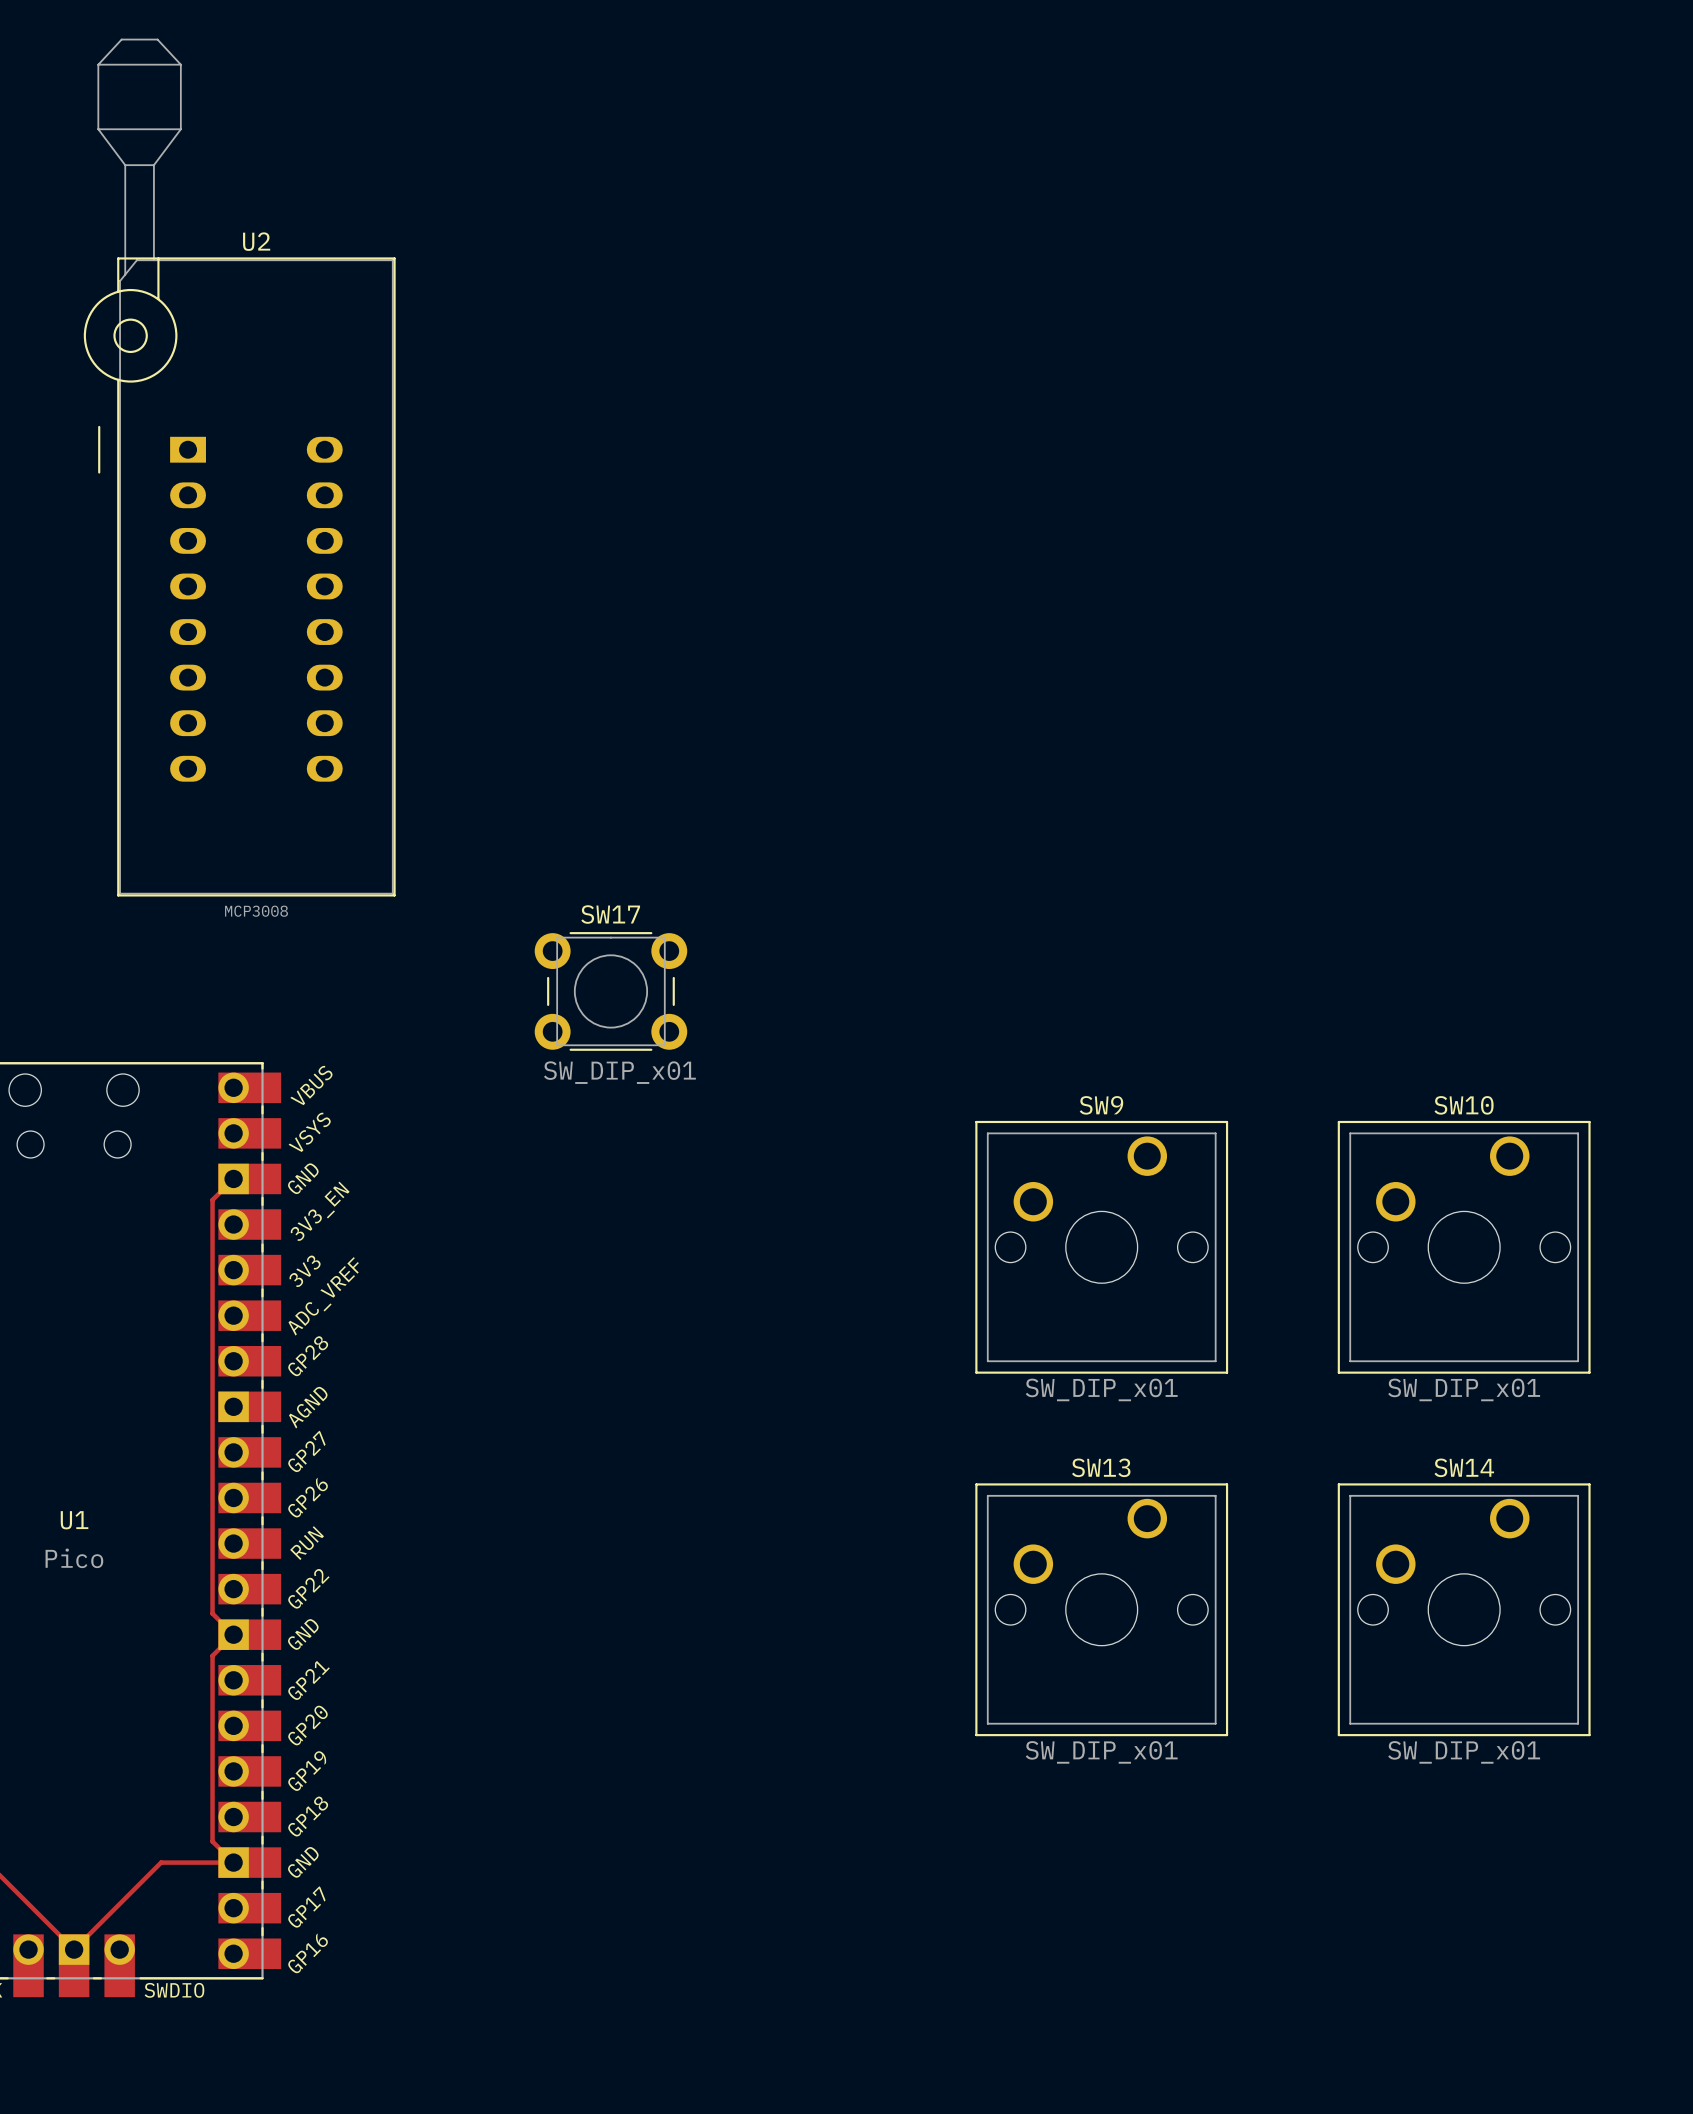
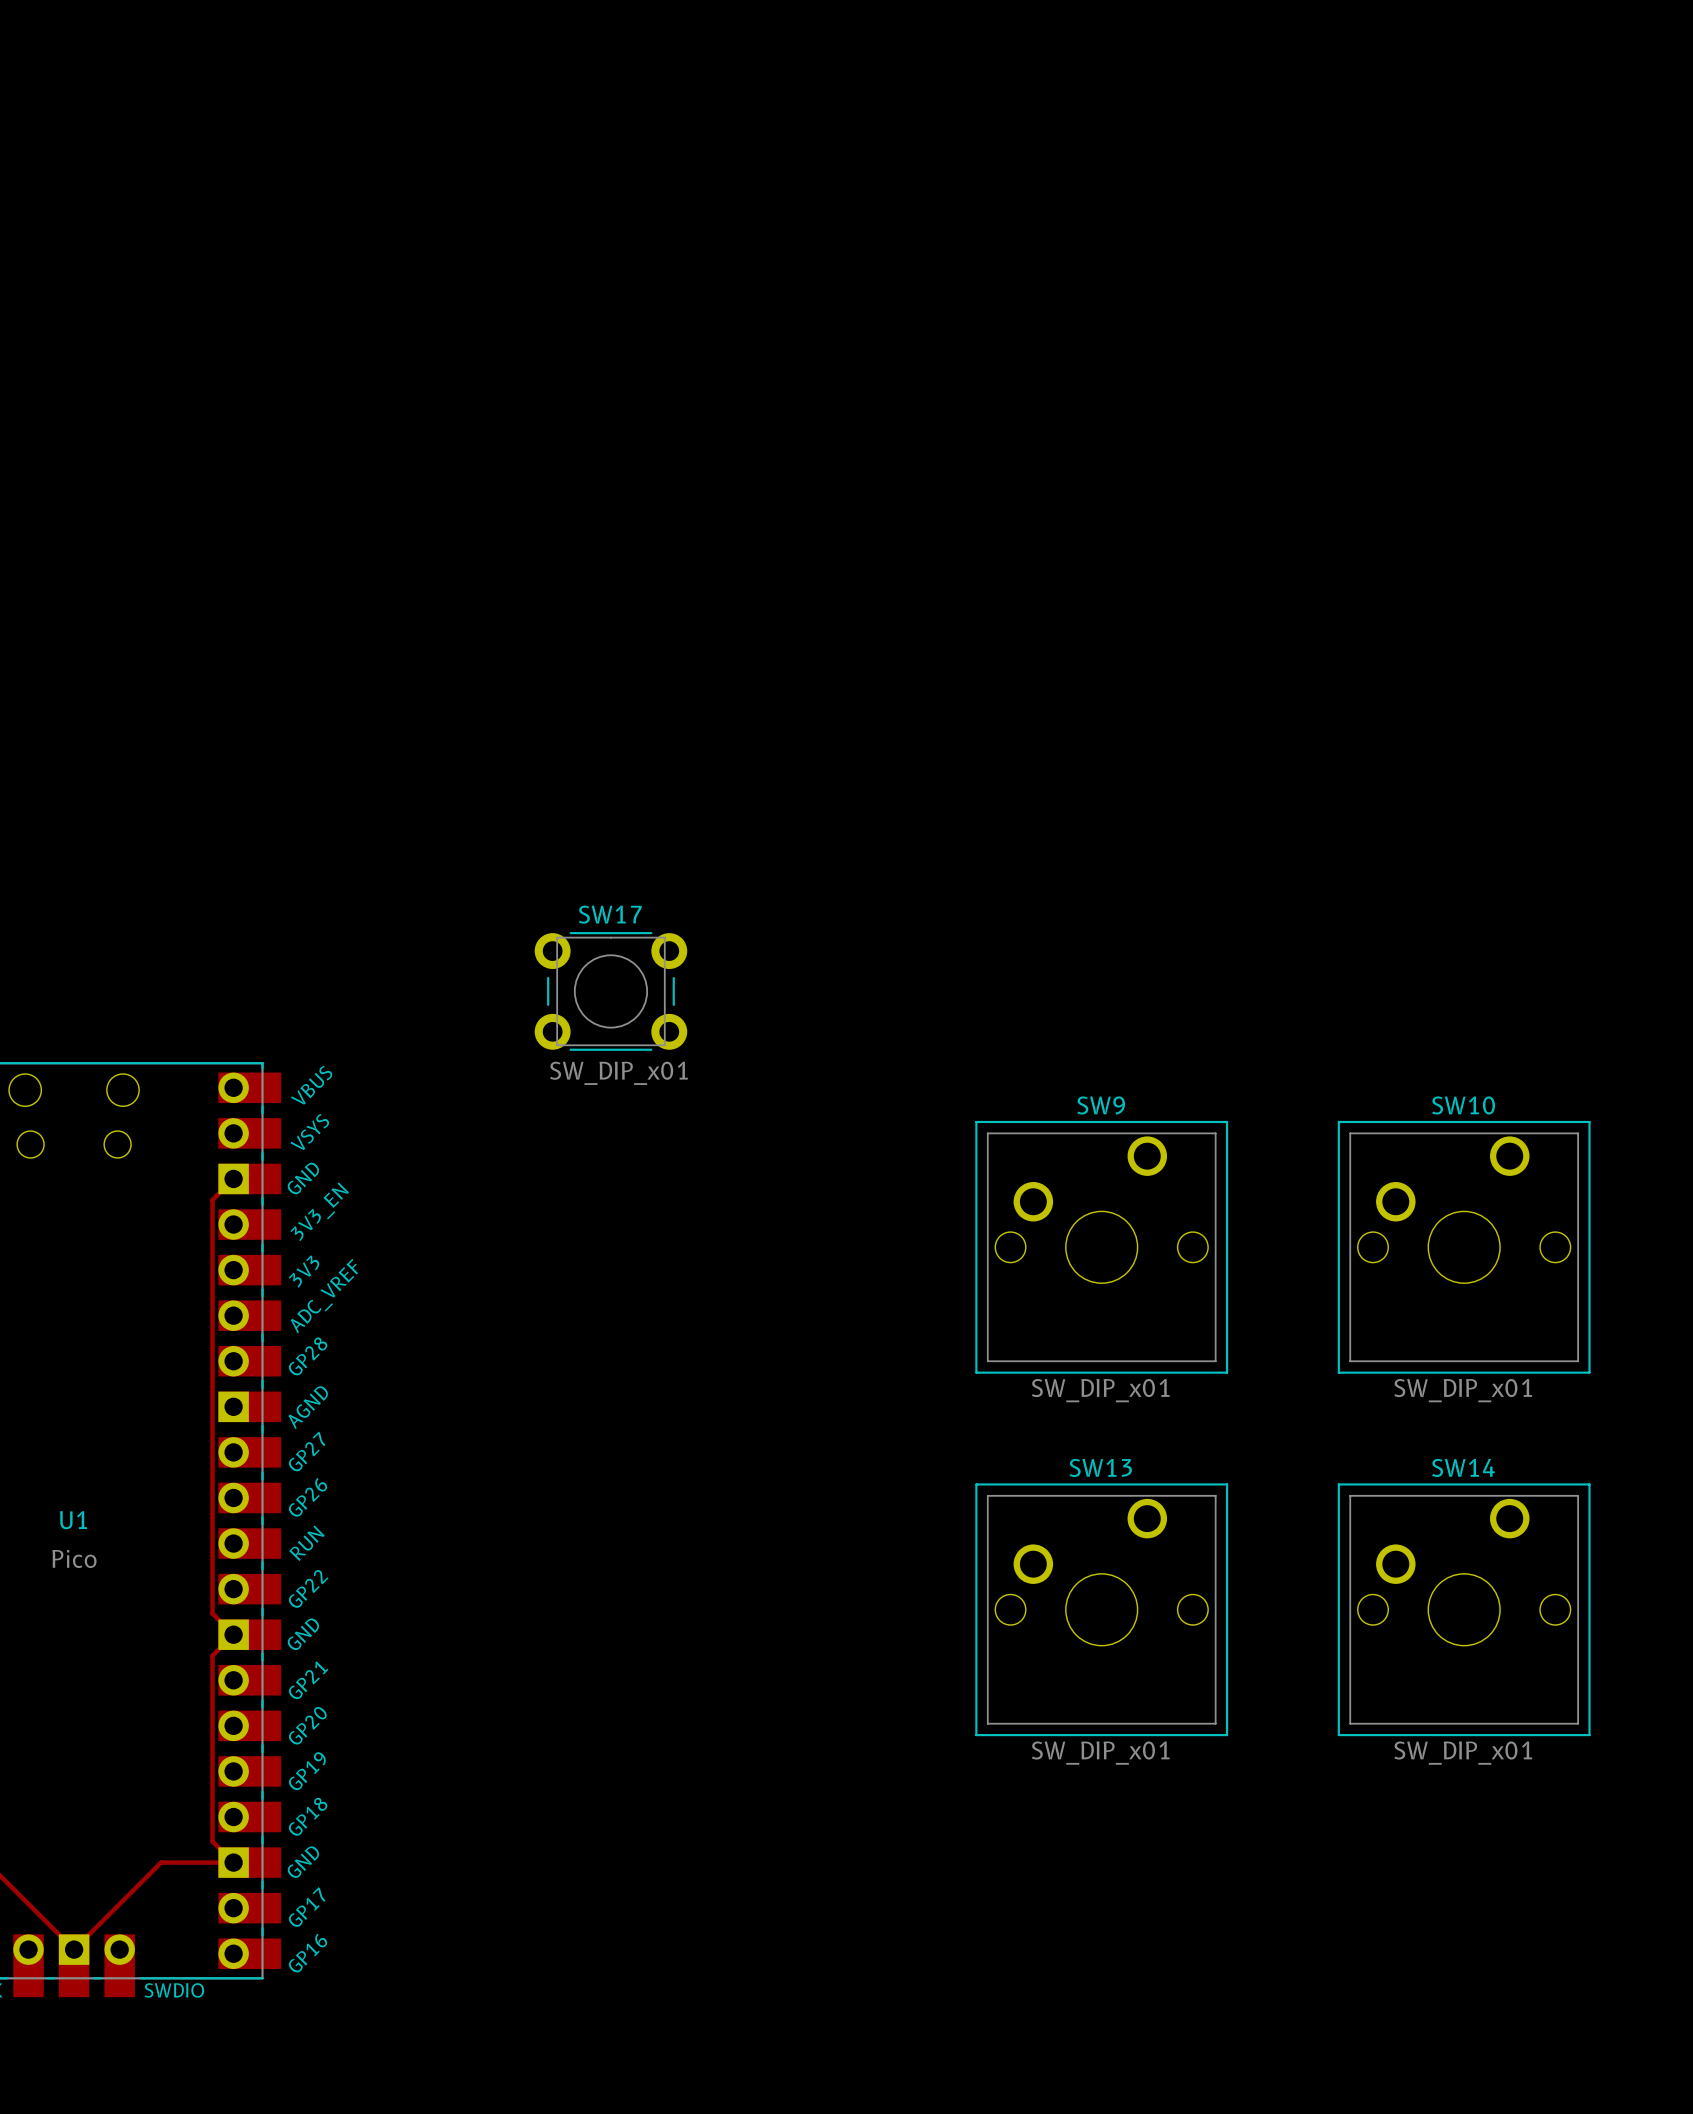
U2: MCP3008 (239, 467) -> none

